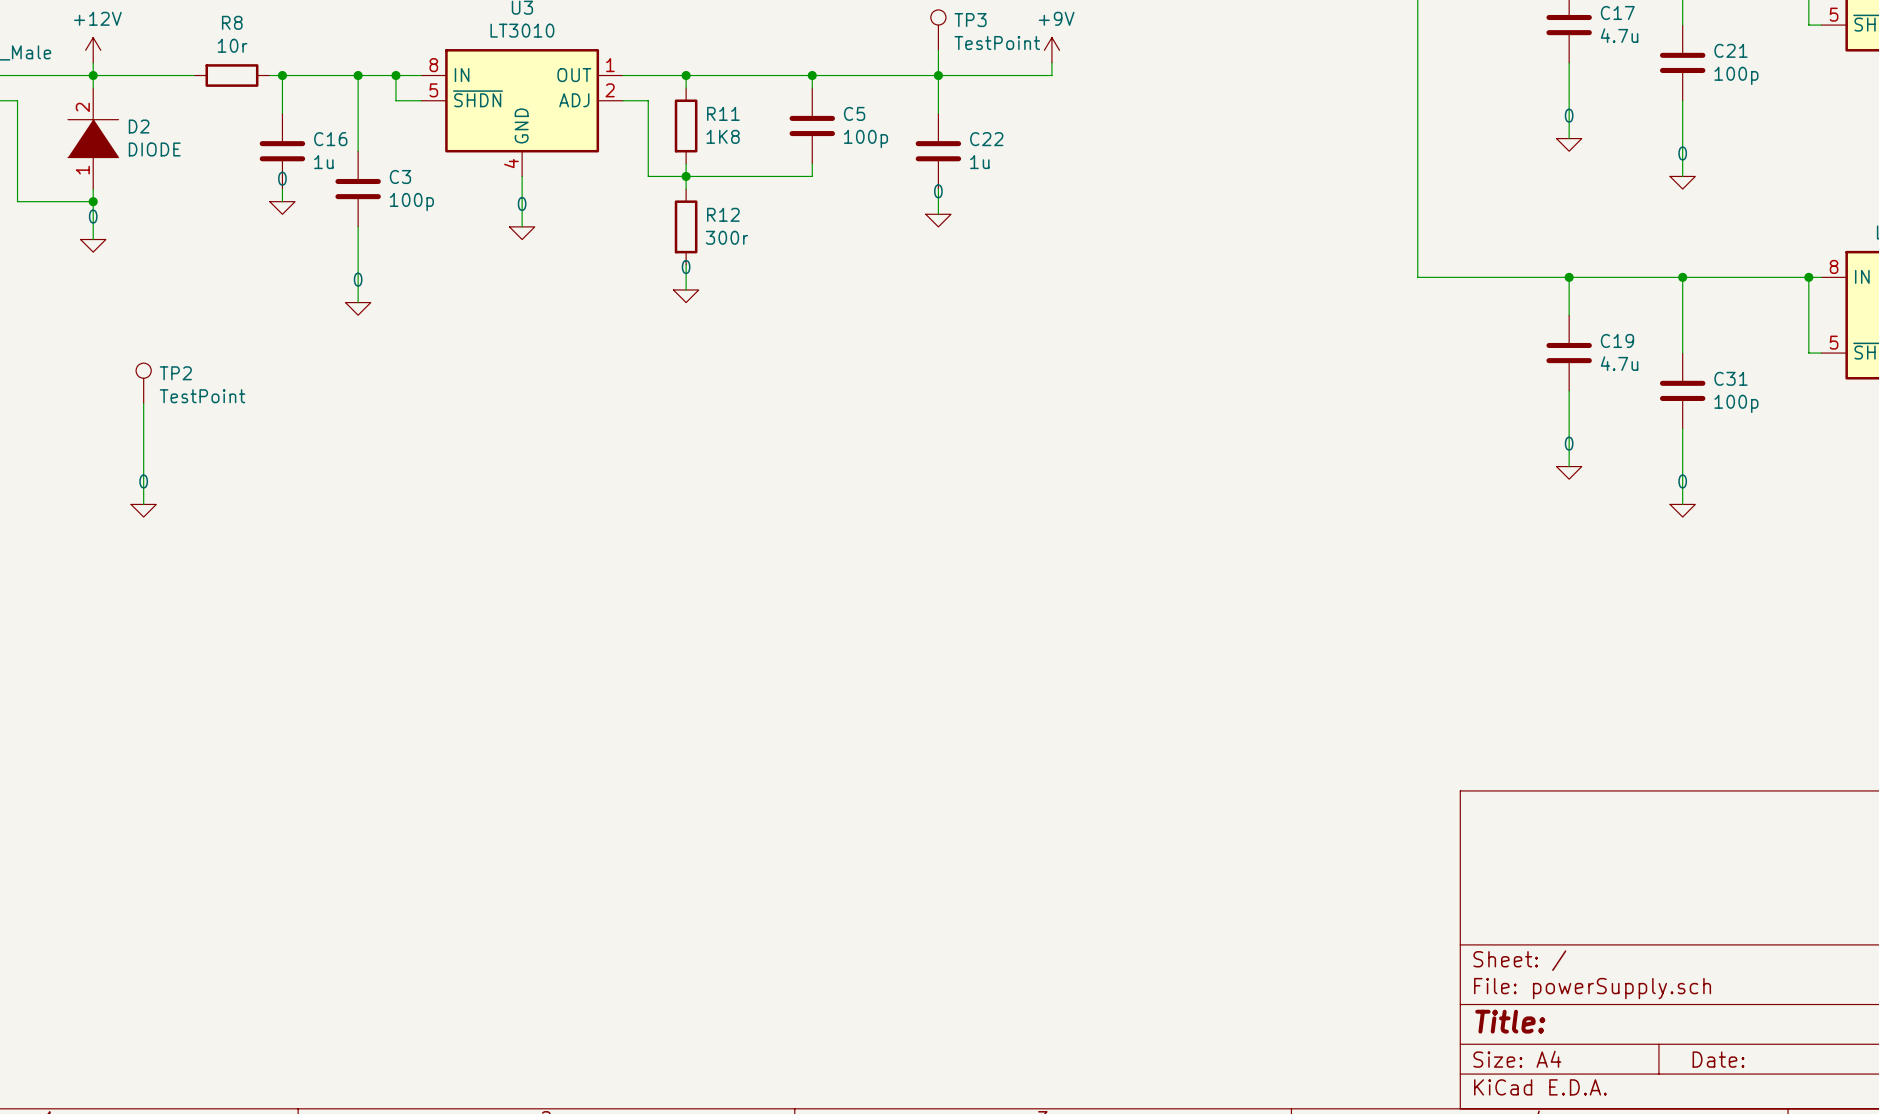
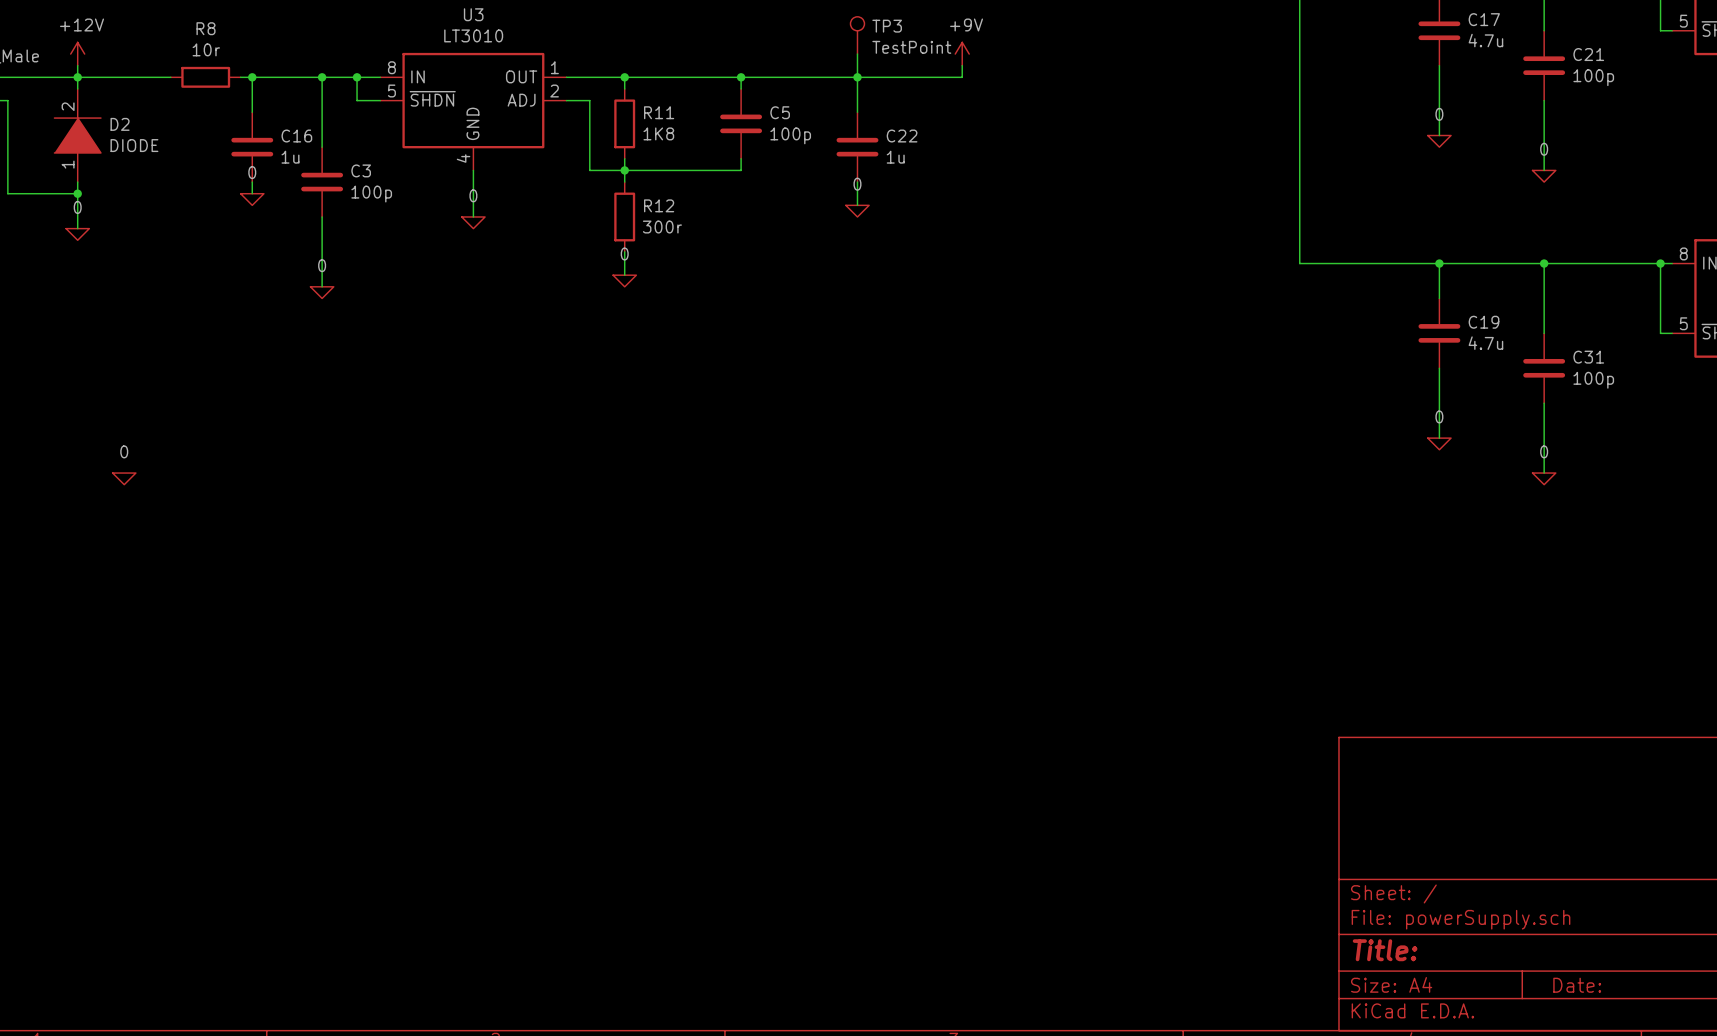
TP2: TestPoint (143, 383) -> none
wire: (143, 403) (143, 504) -> none

